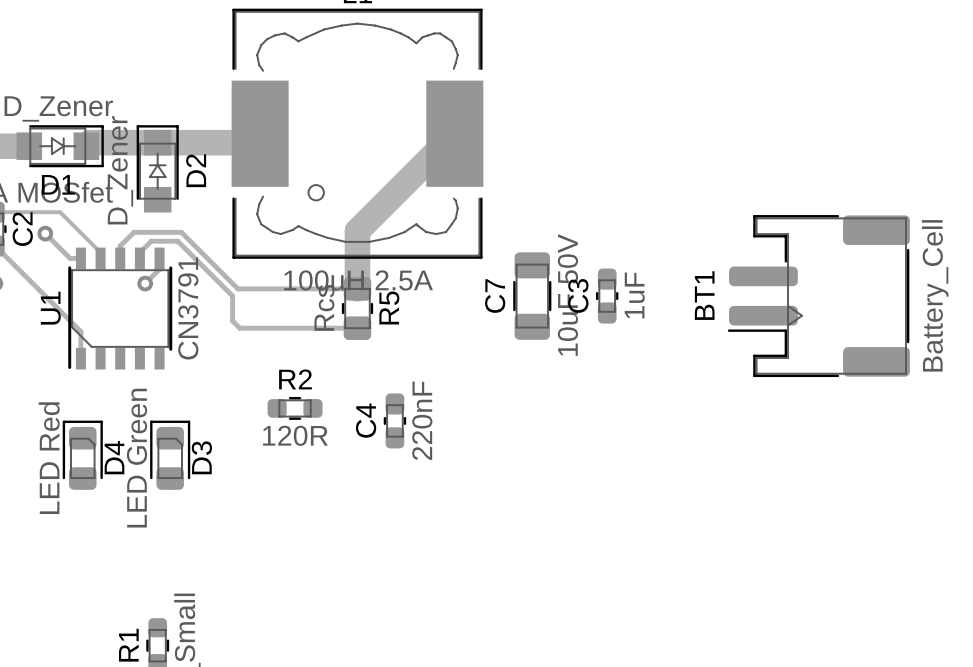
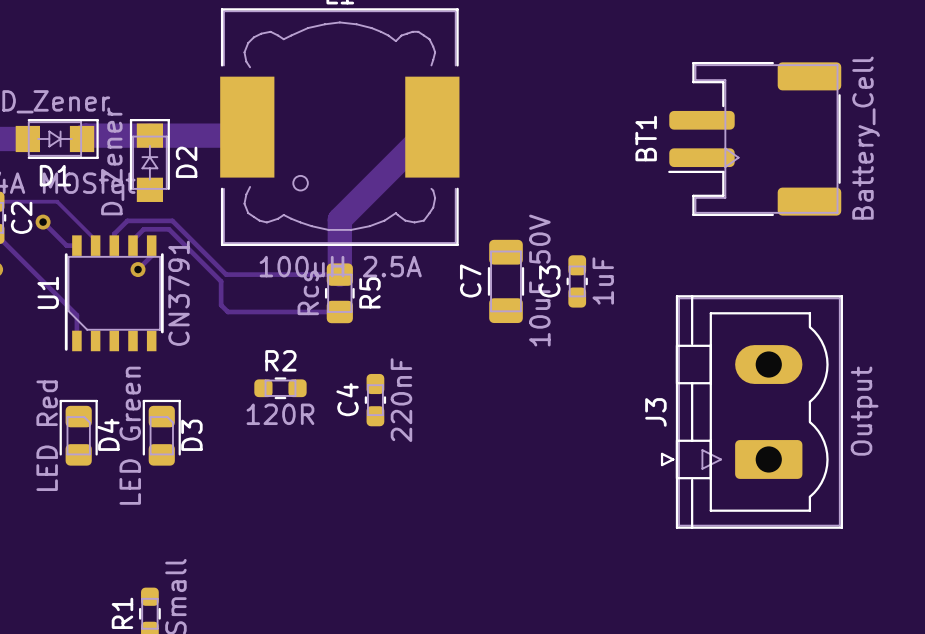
BT1 position: (818, 296) -> (754, 138)
J3: none -> Output (751, 411)

